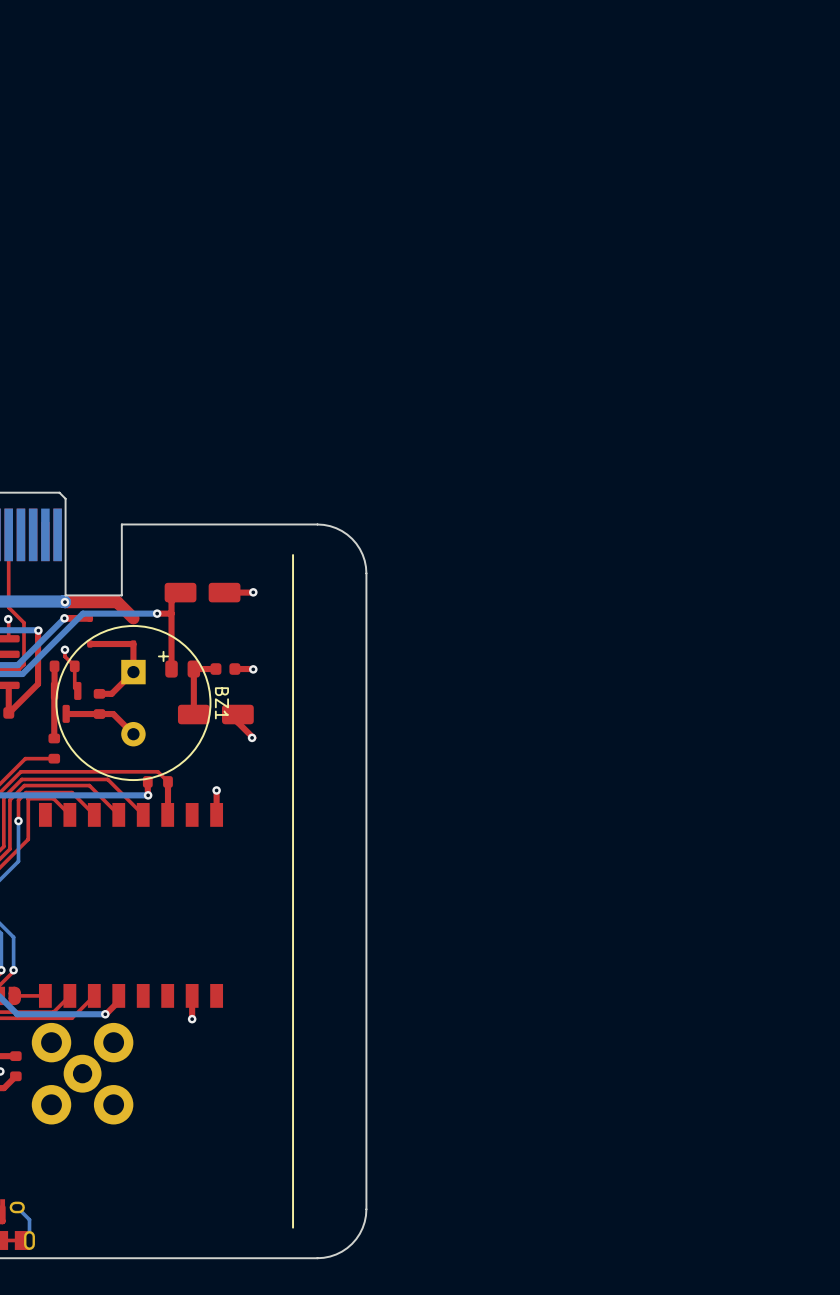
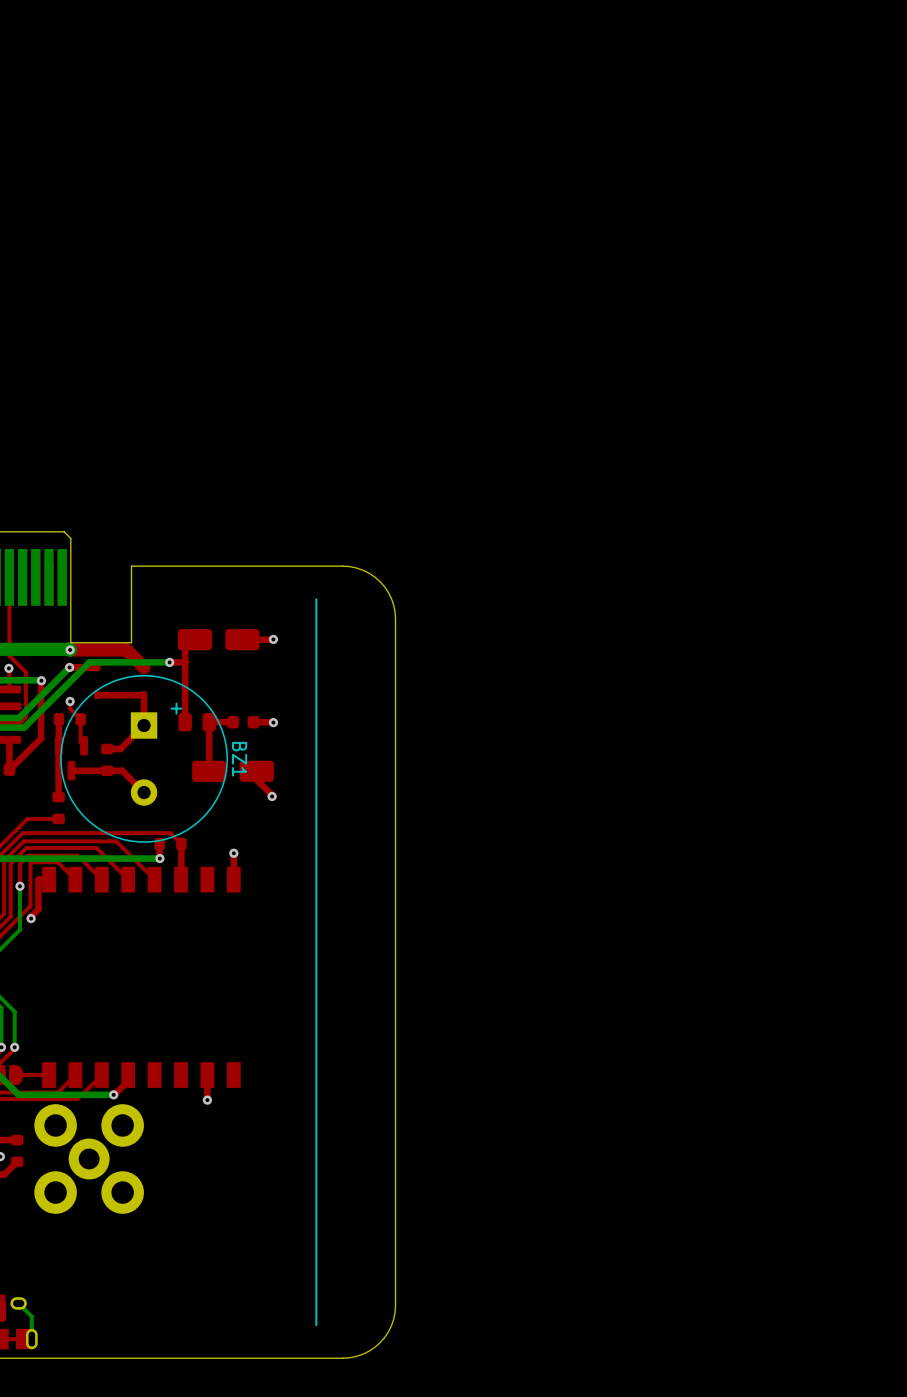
top track: none -> (49, 879) (38, 879) (38, 909) (31, 918)
via: none -> (31, 918)

